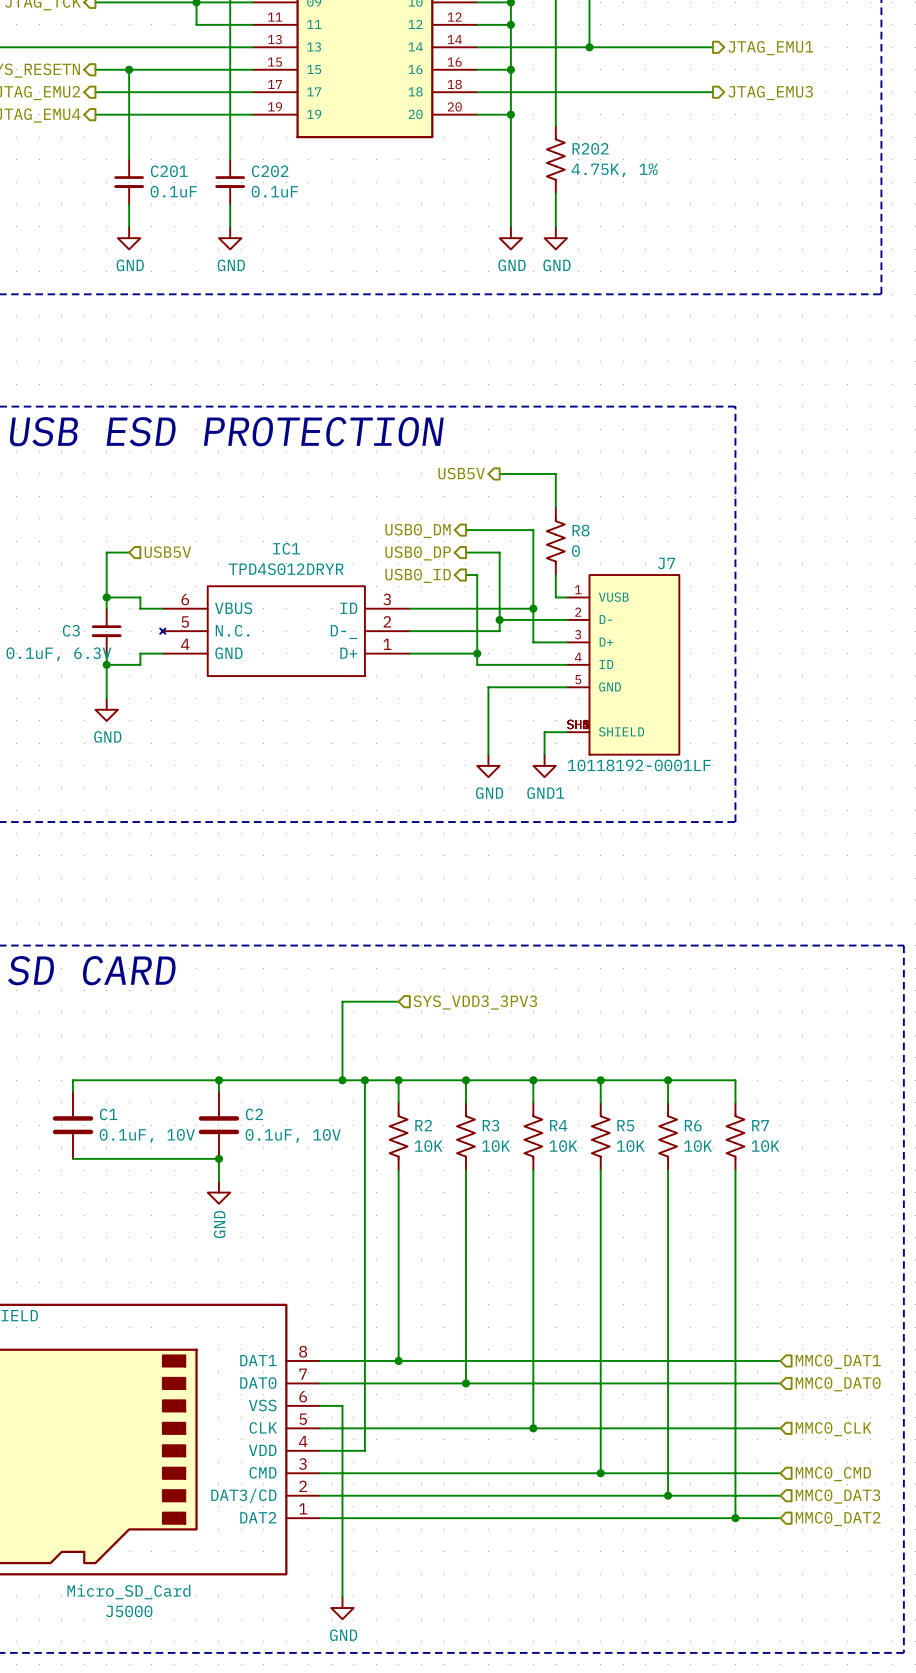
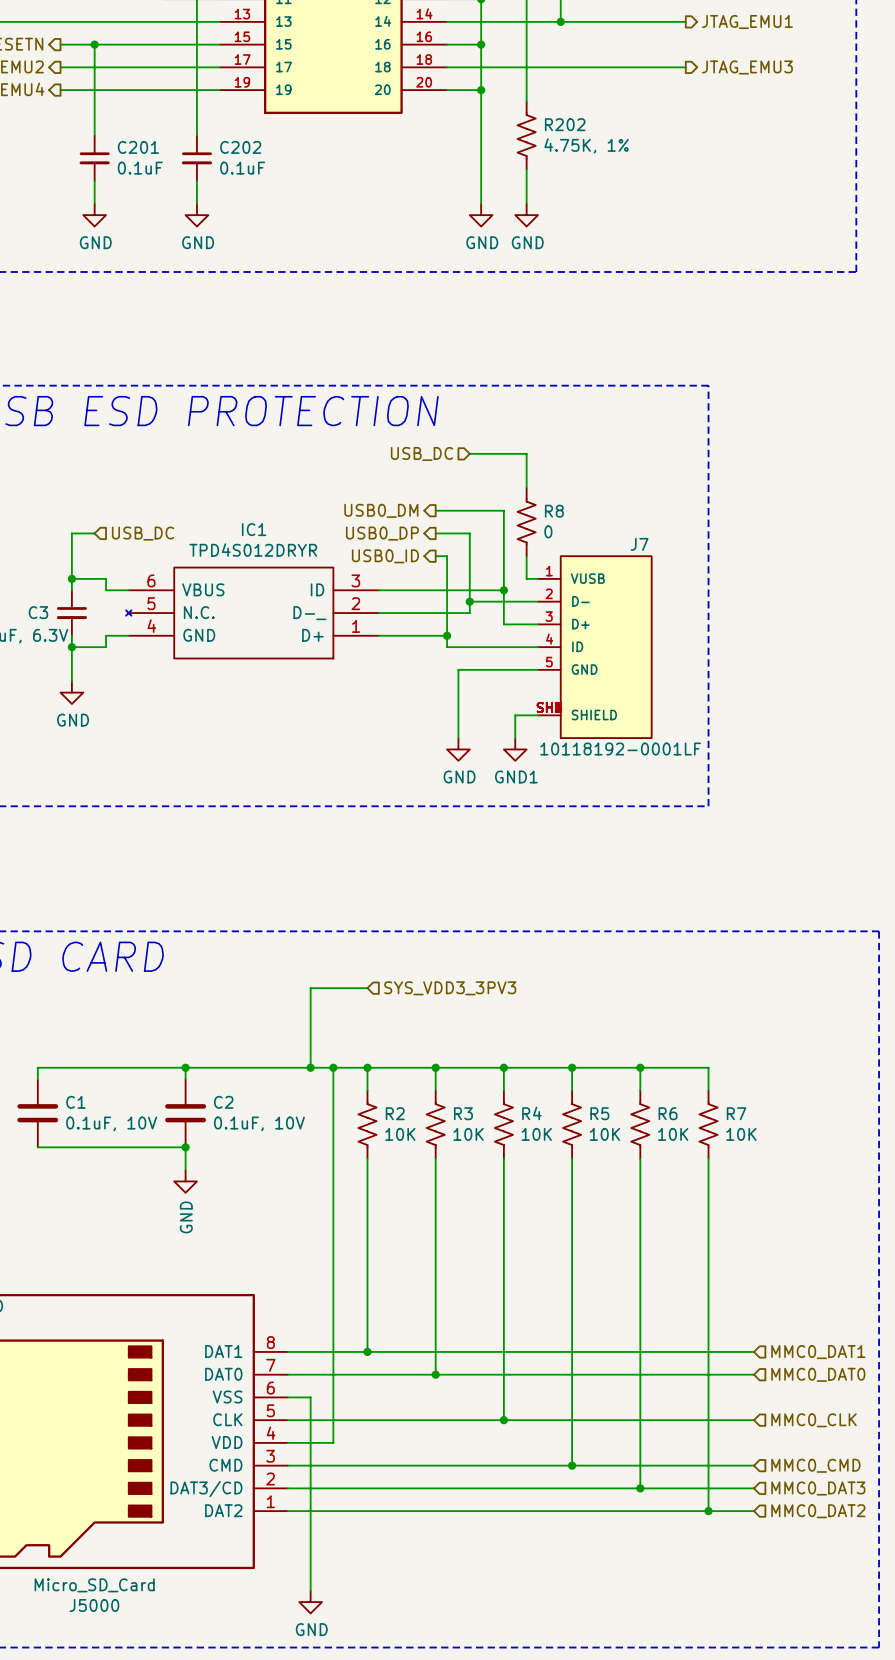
hierarchical label shape: output (461, 473) -> input (421, 453)
hierarchical label: USB5V (461, 473) -> USB_DC (421, 453)
hierarchical label: USB5V (167, 552) -> USB_DC (143, 533)

